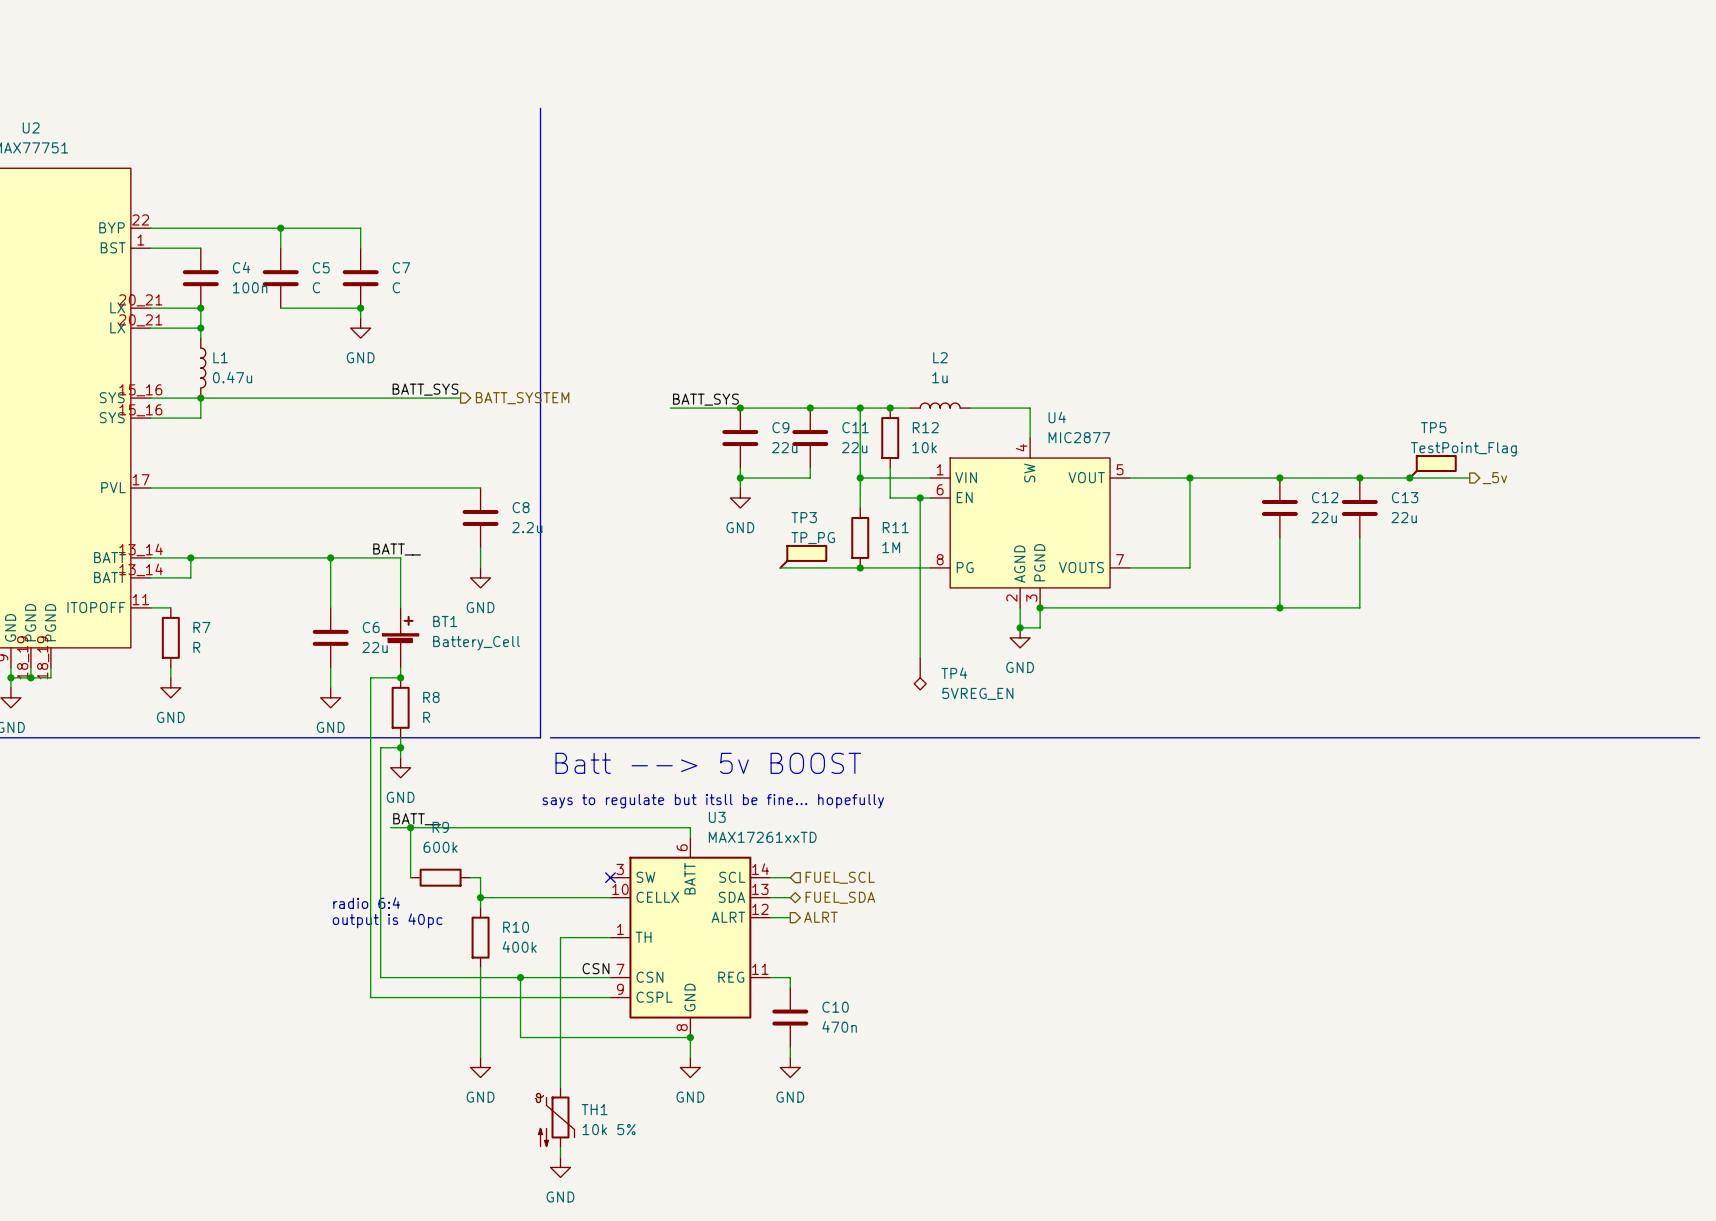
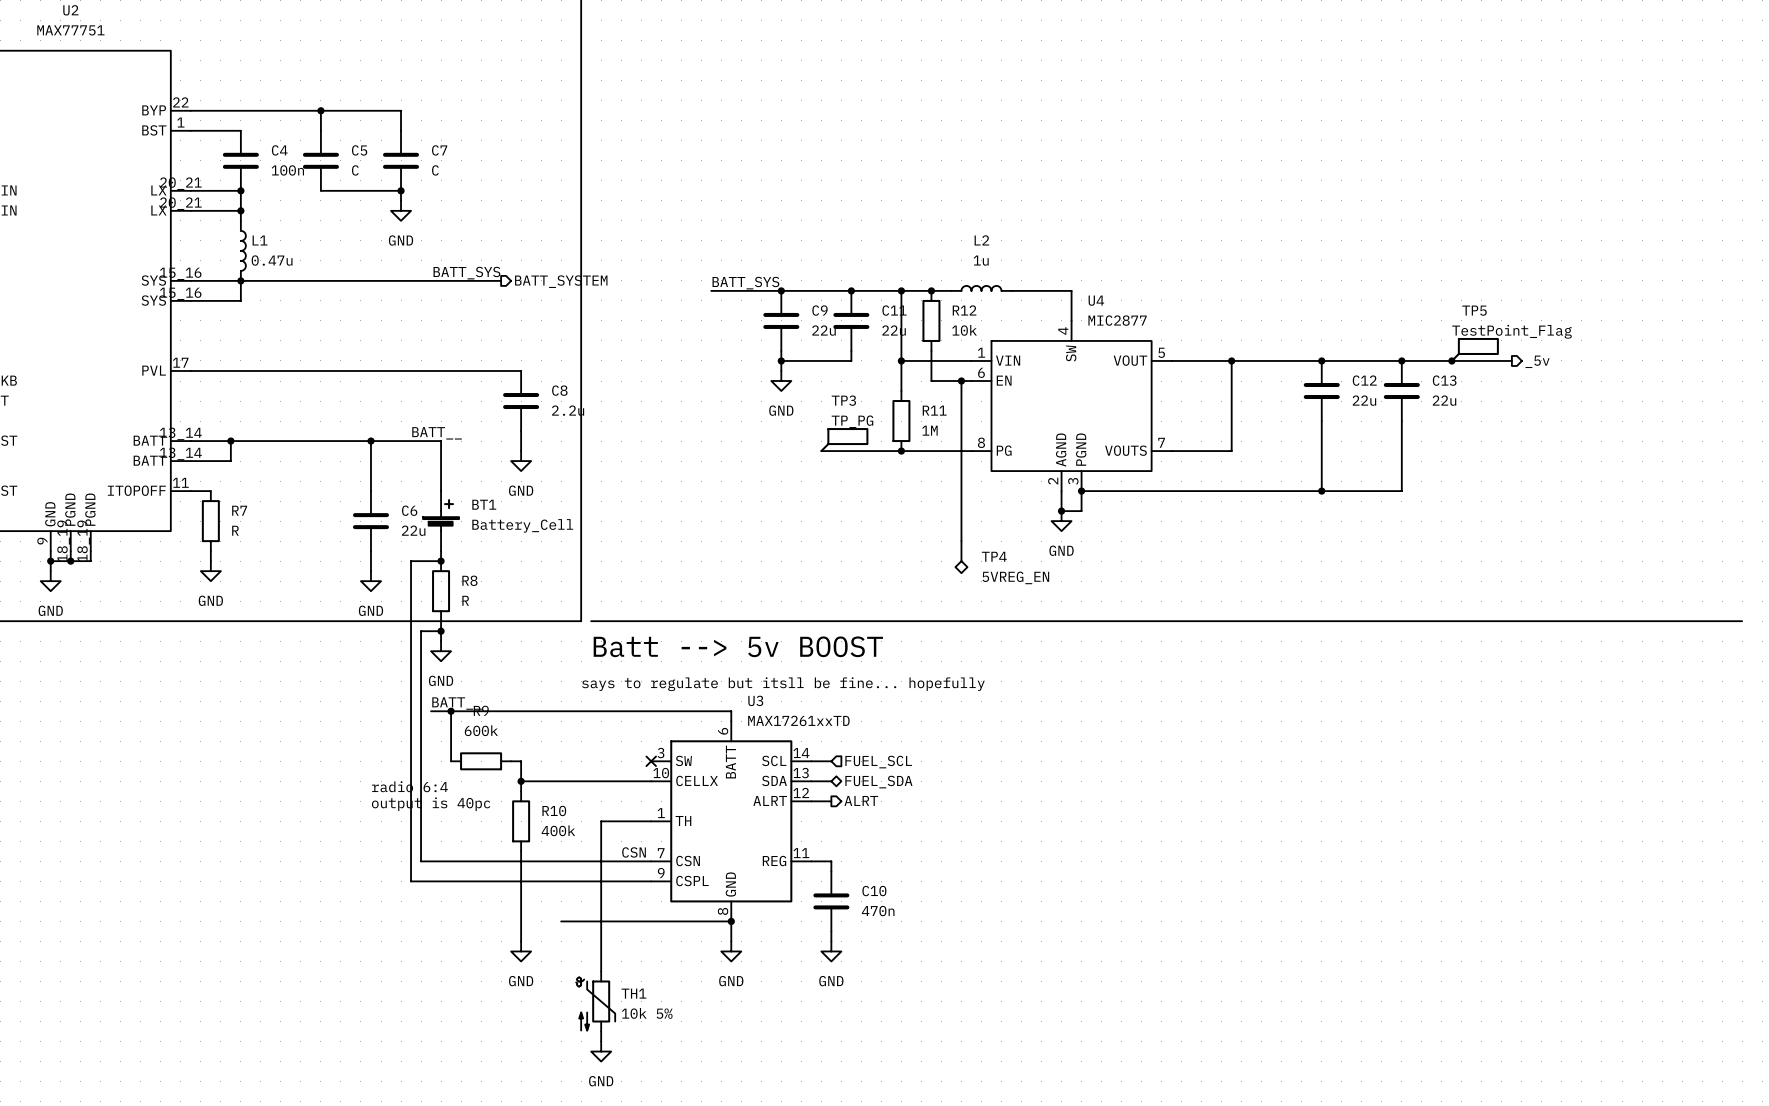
wire: (520, 977) (520, 1037) -> none
junction: (520, 977) -> none

